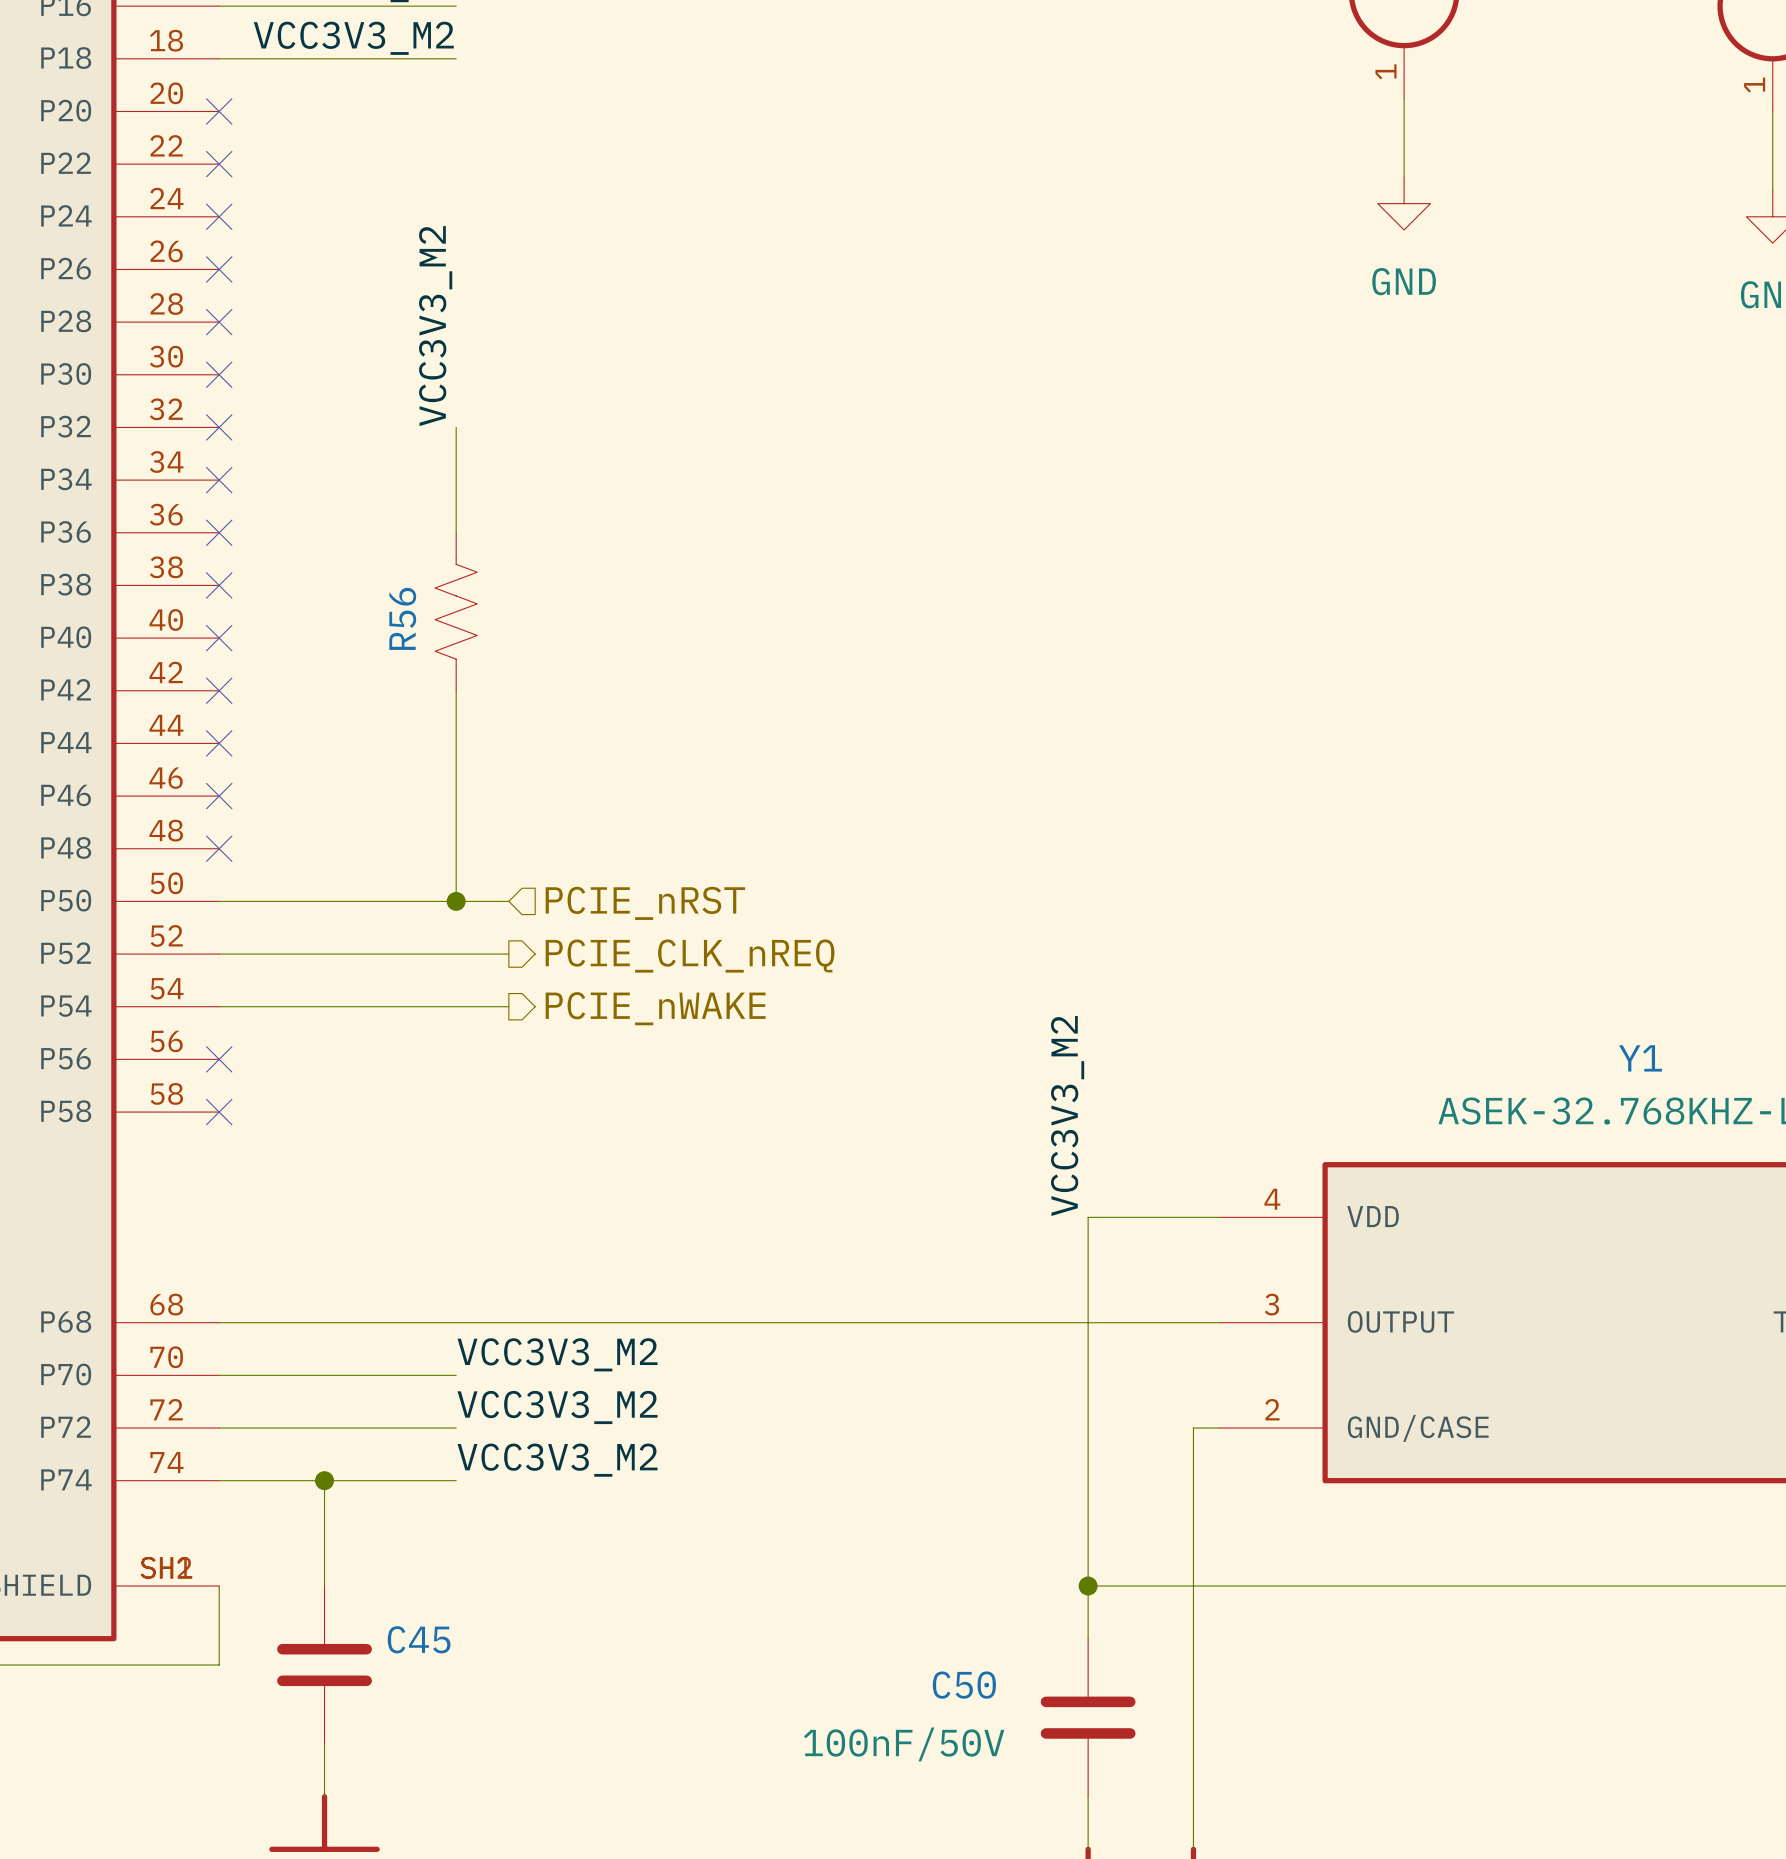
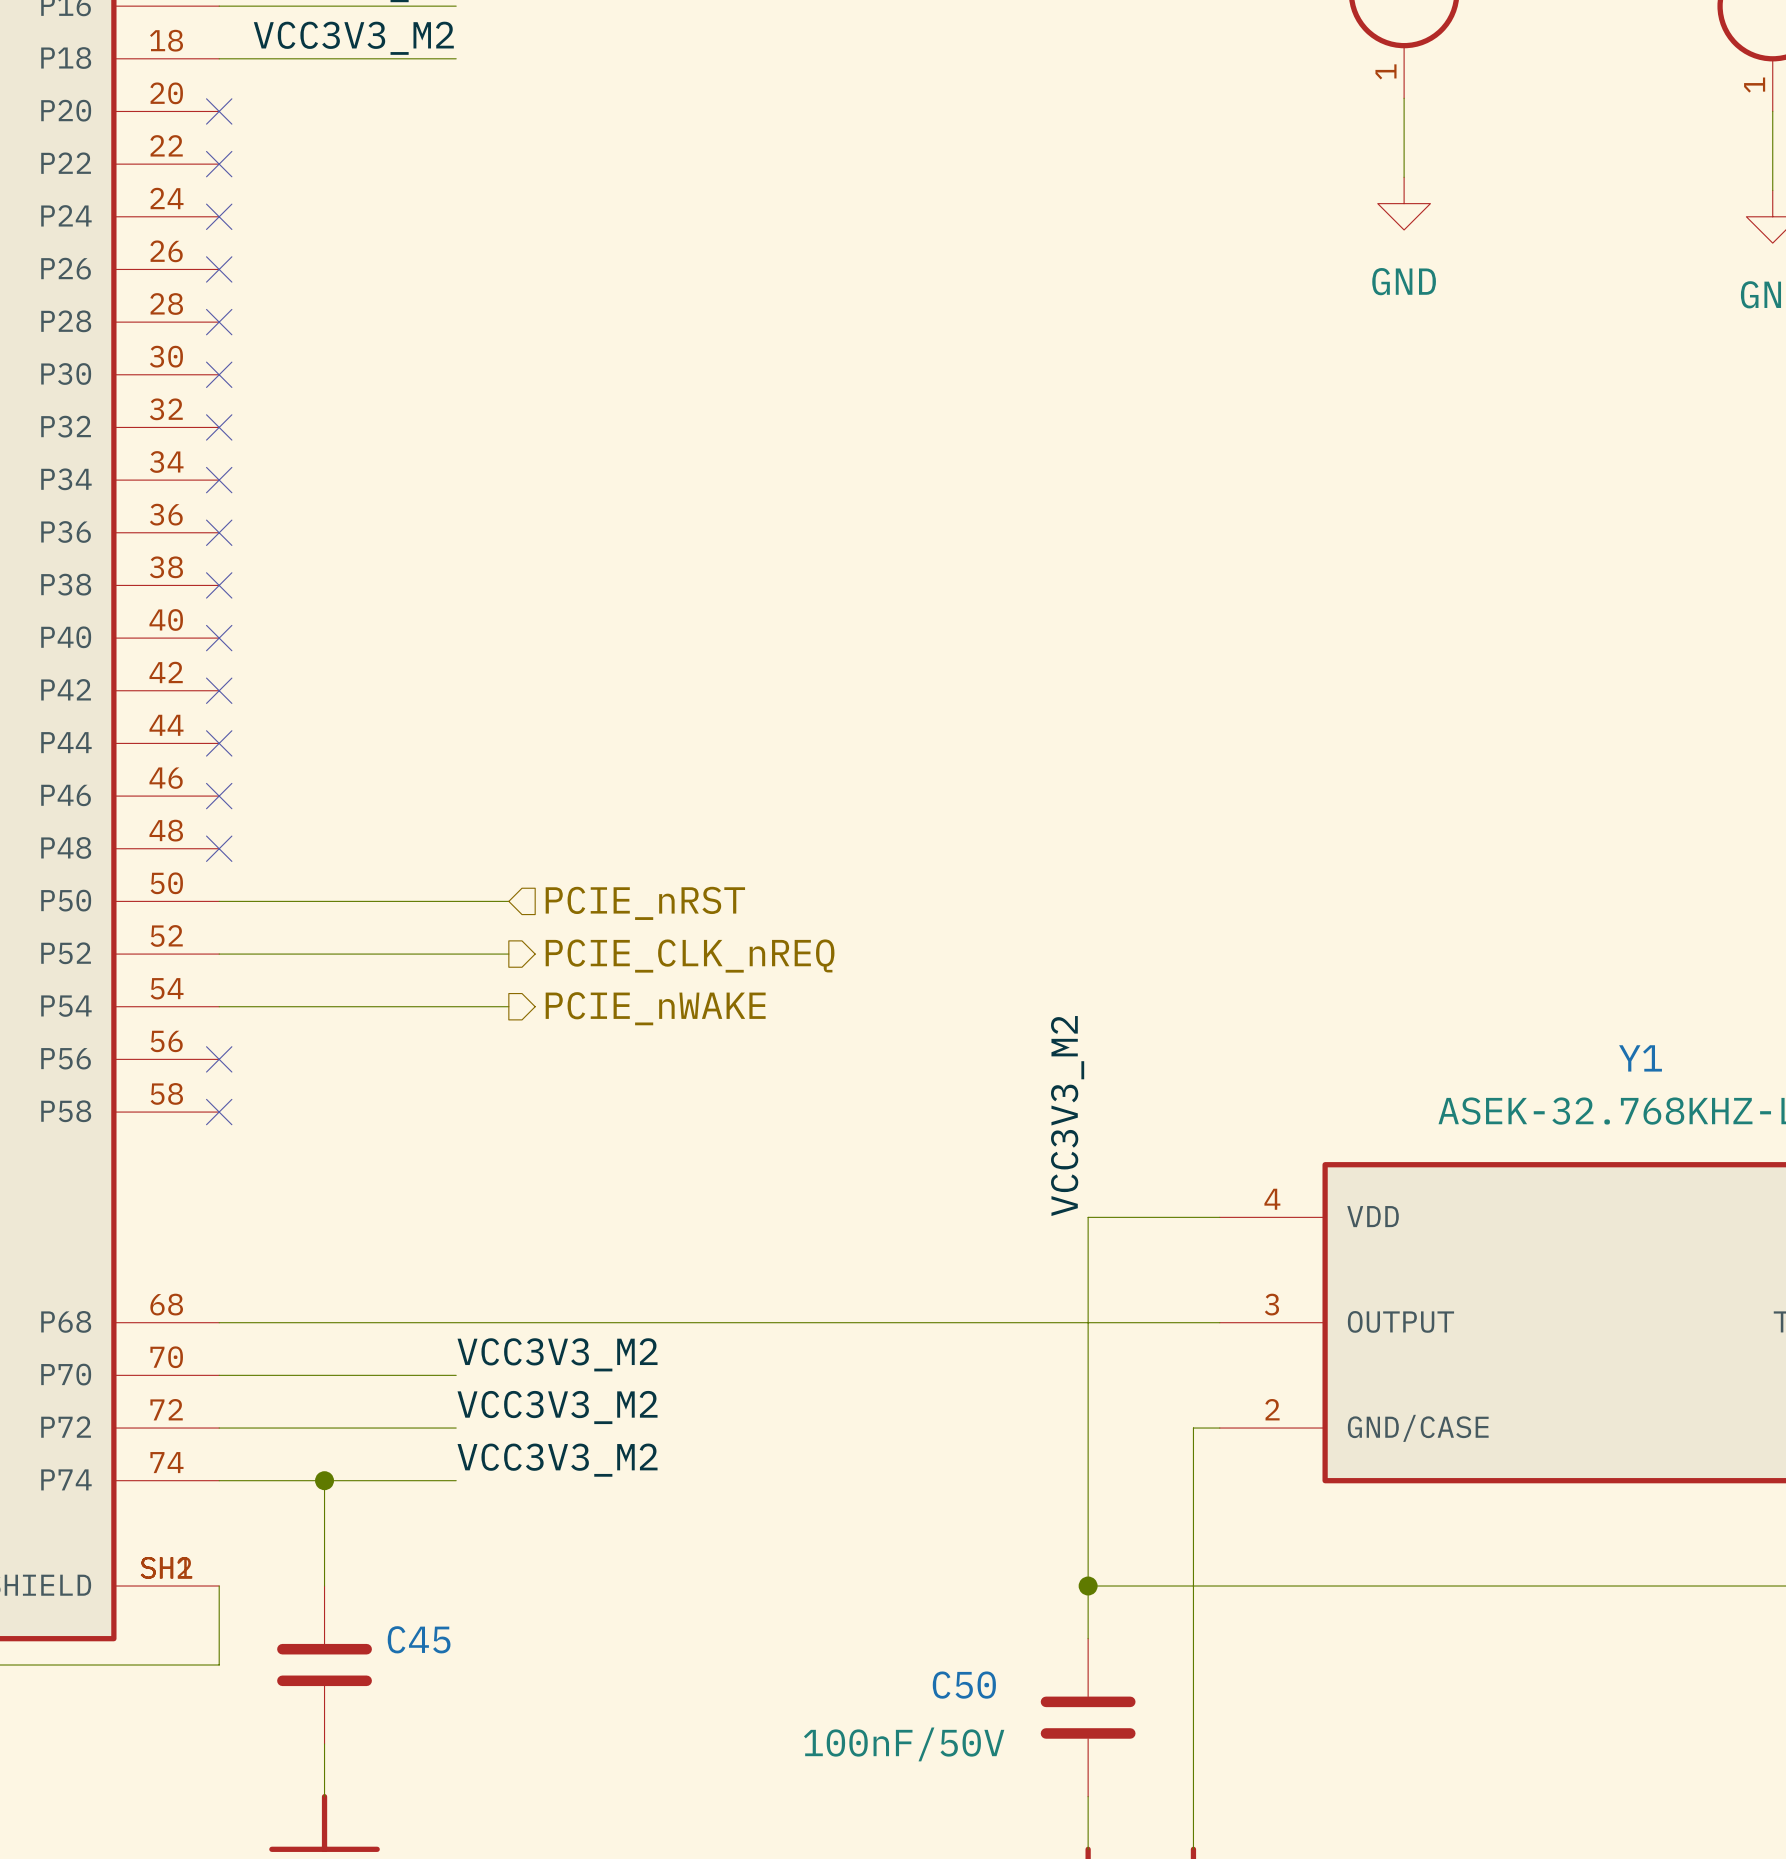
label: VCC3V3_M2 (435, 326) -> none
wire: (456, 427) (456, 532) -> none
R56: (456, 611) -> none
wire: (456, 690) (456, 901) -> none
junction: (456, 901) -> none

